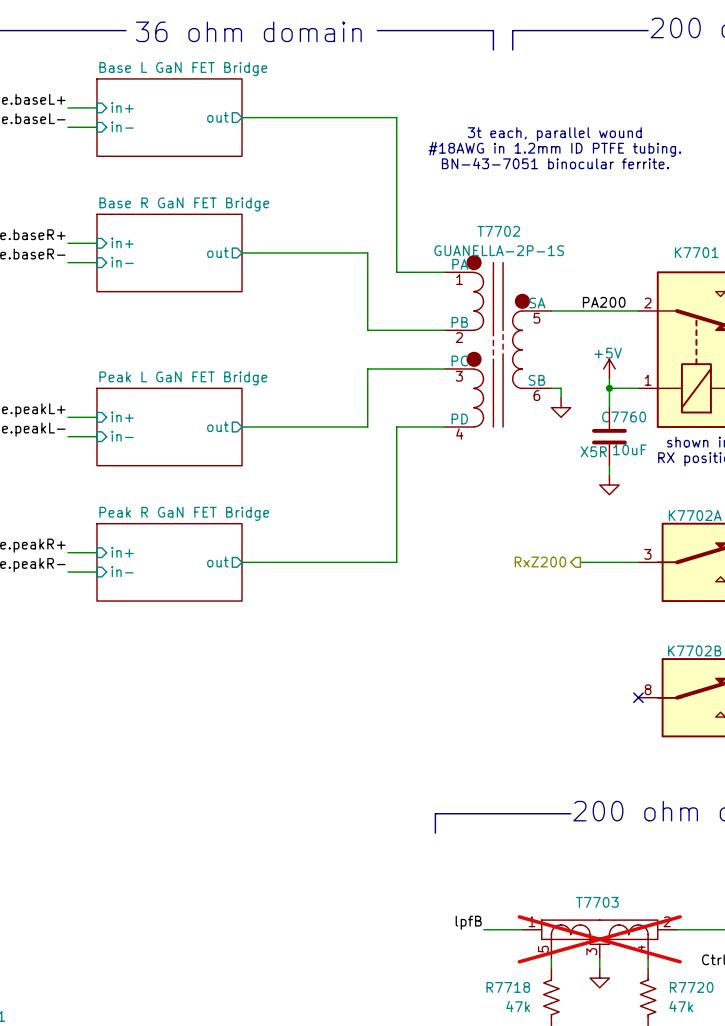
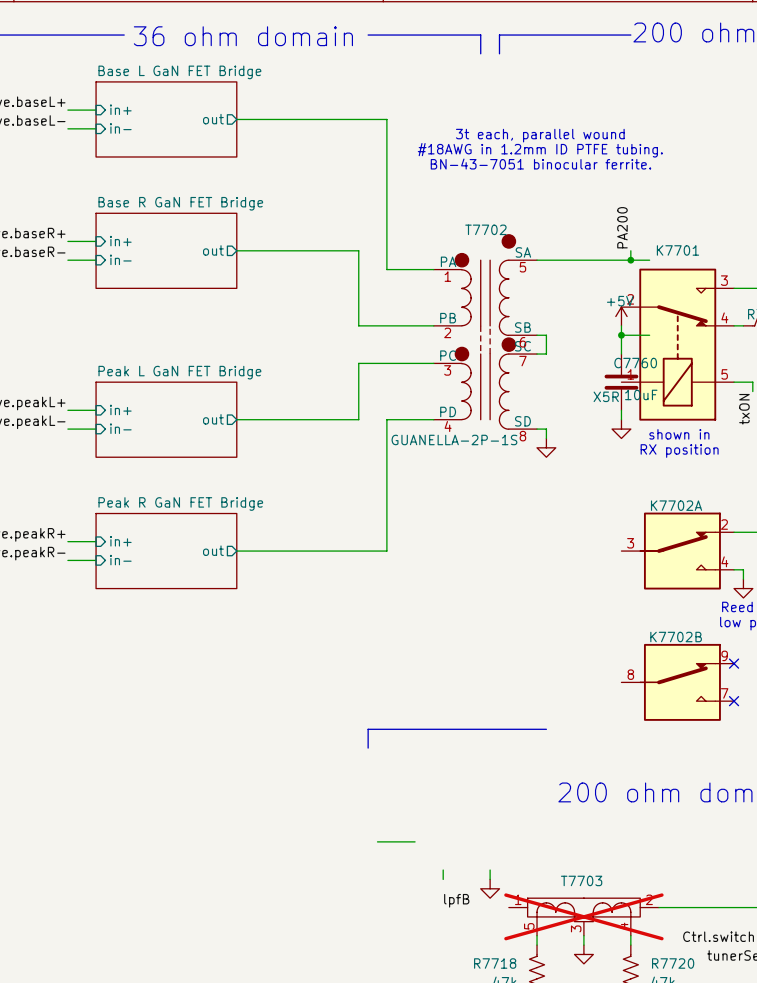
T7702 value position: GUANELLA-2P-1S (499, 250) -> GUANELLA-2P-1S (454, 439)
wire: none -> (630, 250) (630, 260)
T7702 symbol: [445, 255, 552, 428] -> [433, 234, 538, 430]
wire: none -> (537, 260) (649, 260)
junction: none -> (630, 260)
label rotation: 0° (604, 302) -> 90° counterclockwise (622, 227)
label position: PA200 (604, 302) -> PA200 (622, 227)
wire: (551, 310) (638, 310) -> none
wire: none -> (537, 335) (546, 335) (546, 354) (537, 354)
junction: none -> (621, 335)
power symbol position: +5V (609, 368) -> +5V (621, 316)
wire: (609, 378) (609, 407) -> (621, 325) (621, 354)
wire: (551, 388) (561, 388) (561, 398) -> (537, 429) (546, 429) (546, 438)
wire: (609, 388) (638, 388) -> (621, 335) (649, 335)
junction: (609, 388) -> none
power symbol: (561, 407) -> none
C7760 position: (609, 436) -> (621, 382)
power symbol: none -> (621, 429)
power symbol: none -> (546, 447)
wire: (609, 465) (609, 475) -> (621, 410) (621, 419)
power symbol: (609, 485) -> none
hierarchical label: RxZ200 (540, 562) -> none
wire: (580, 562) (638, 562) -> none
no-connect mark: (638, 697) -> none
line: none -> (546, 729) (368, 729) (368, 748)
line: (570, 813) (435, 813) (435, 833) -> none
wire: none -> (443, 870) (443, 879)
wire: none -> (490, 870) (490, 879)
power symbol: none -> (490, 888)
wire: (483, 929) (522, 929) -> (377, 841) (415, 841)

